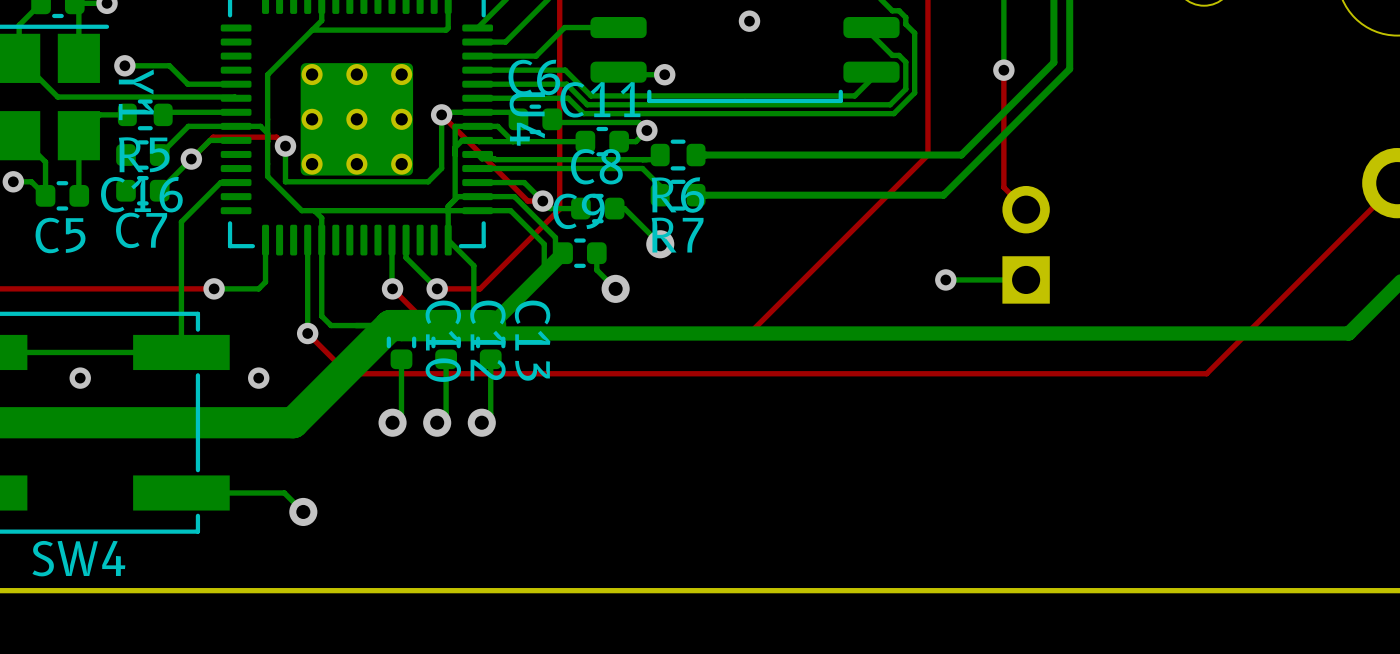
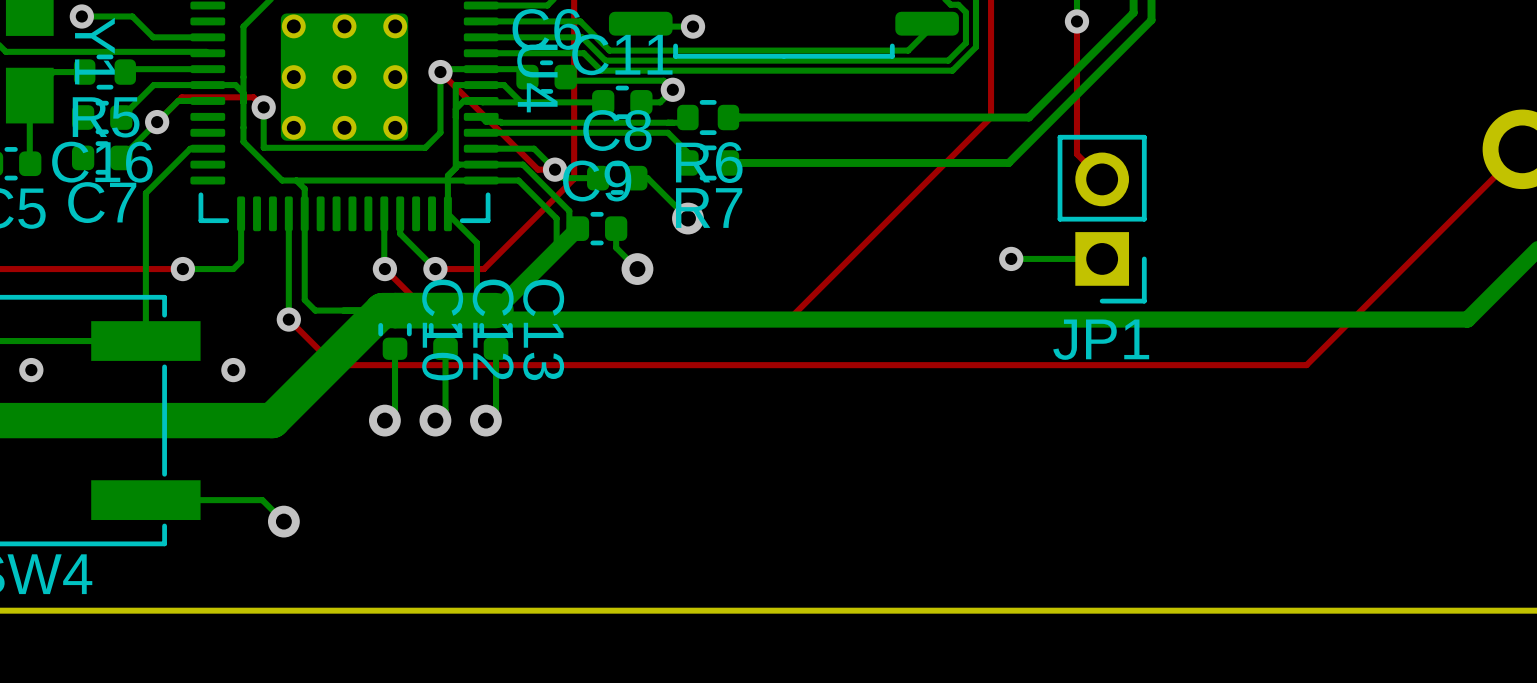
JP1 side: top (1026, 244) -> bottom (1102, 219)

